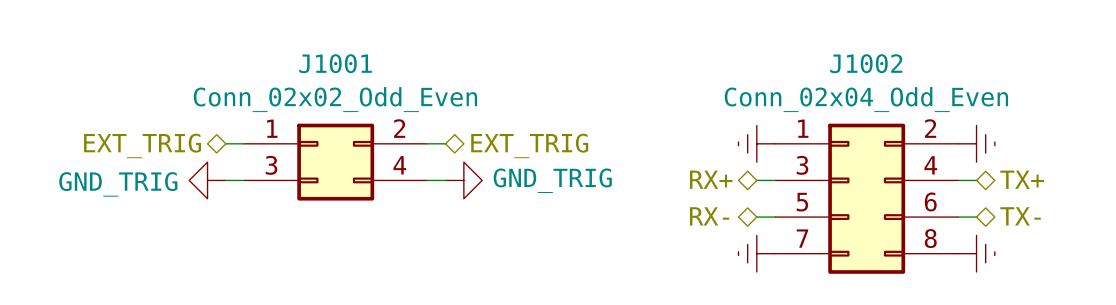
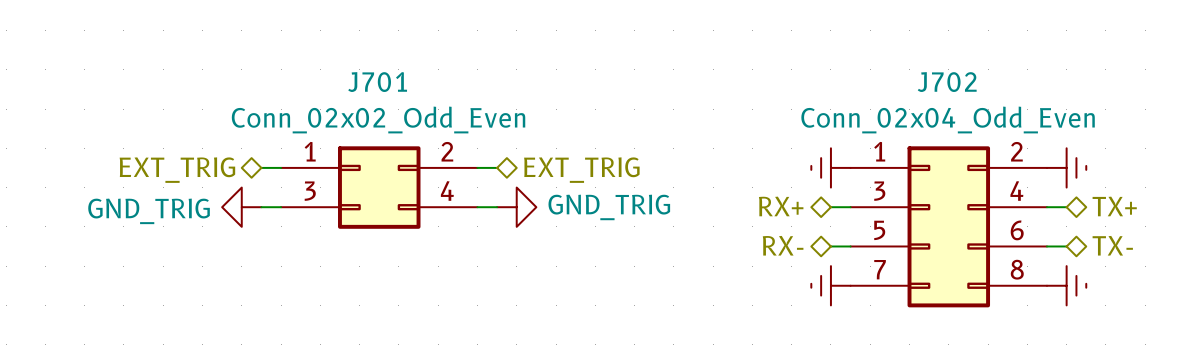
J1001 name: J1001 (335, 63) -> J701 (377, 82)
J1002 name: J1002 (866, 63) -> J702 (947, 82)

